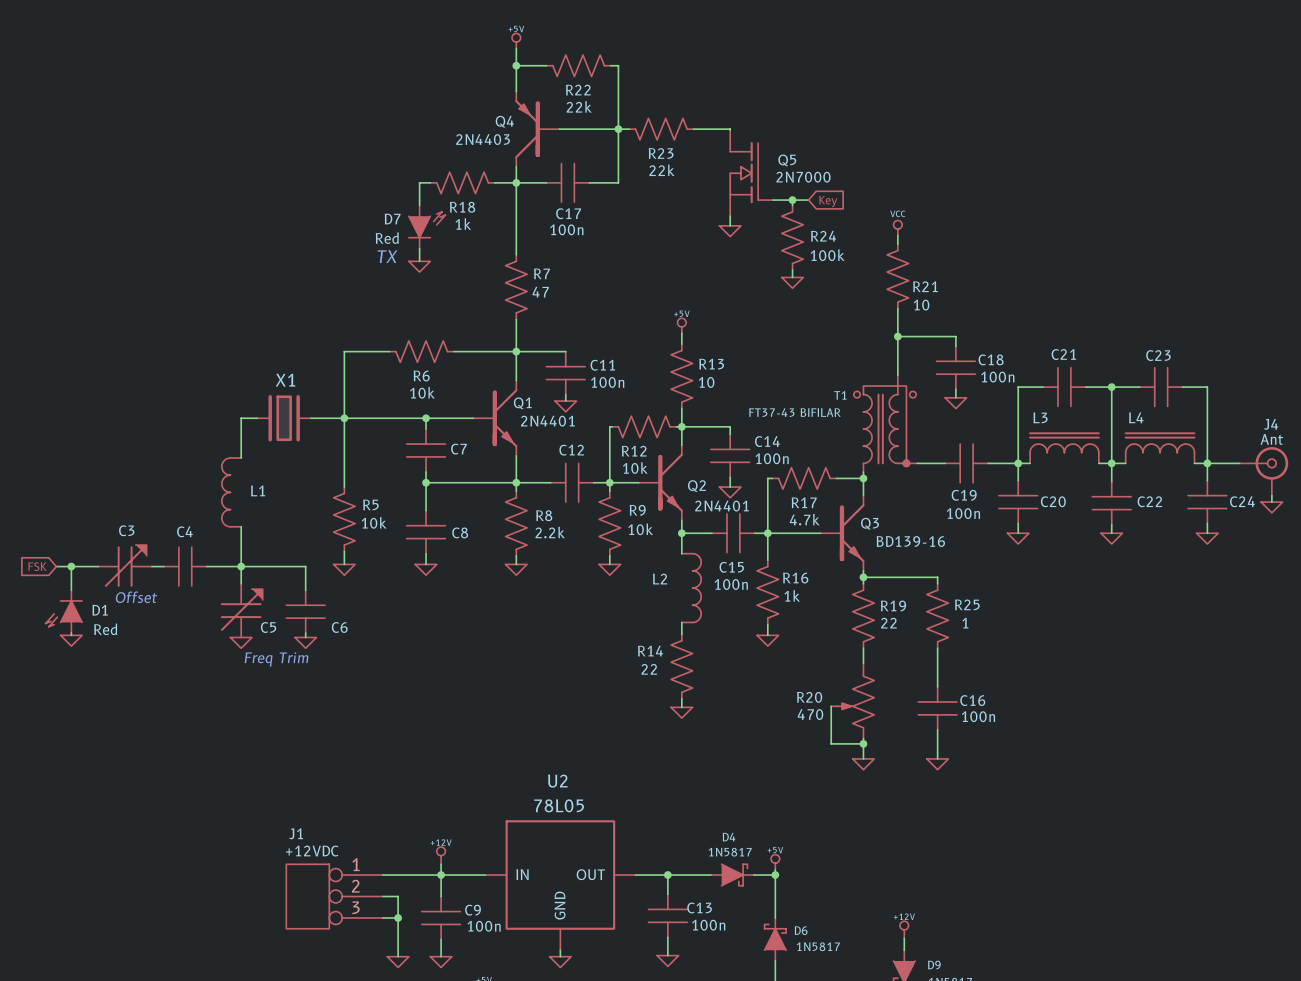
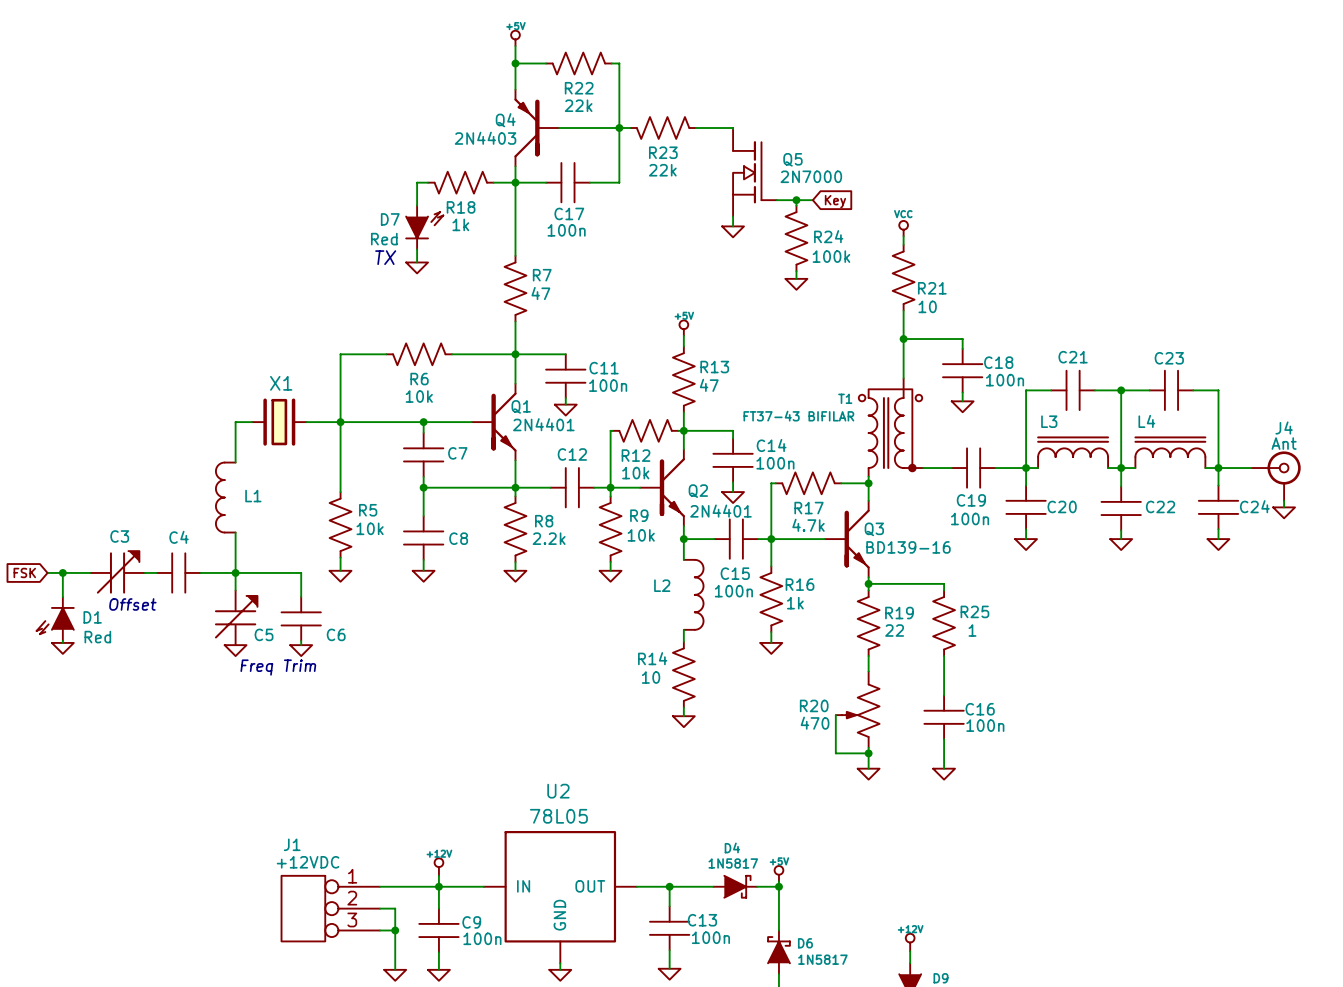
R13 value: 10 (706, 382) -> 47 (709, 385)
R14 value: 22 (649, 669) -> 10 (651, 677)

